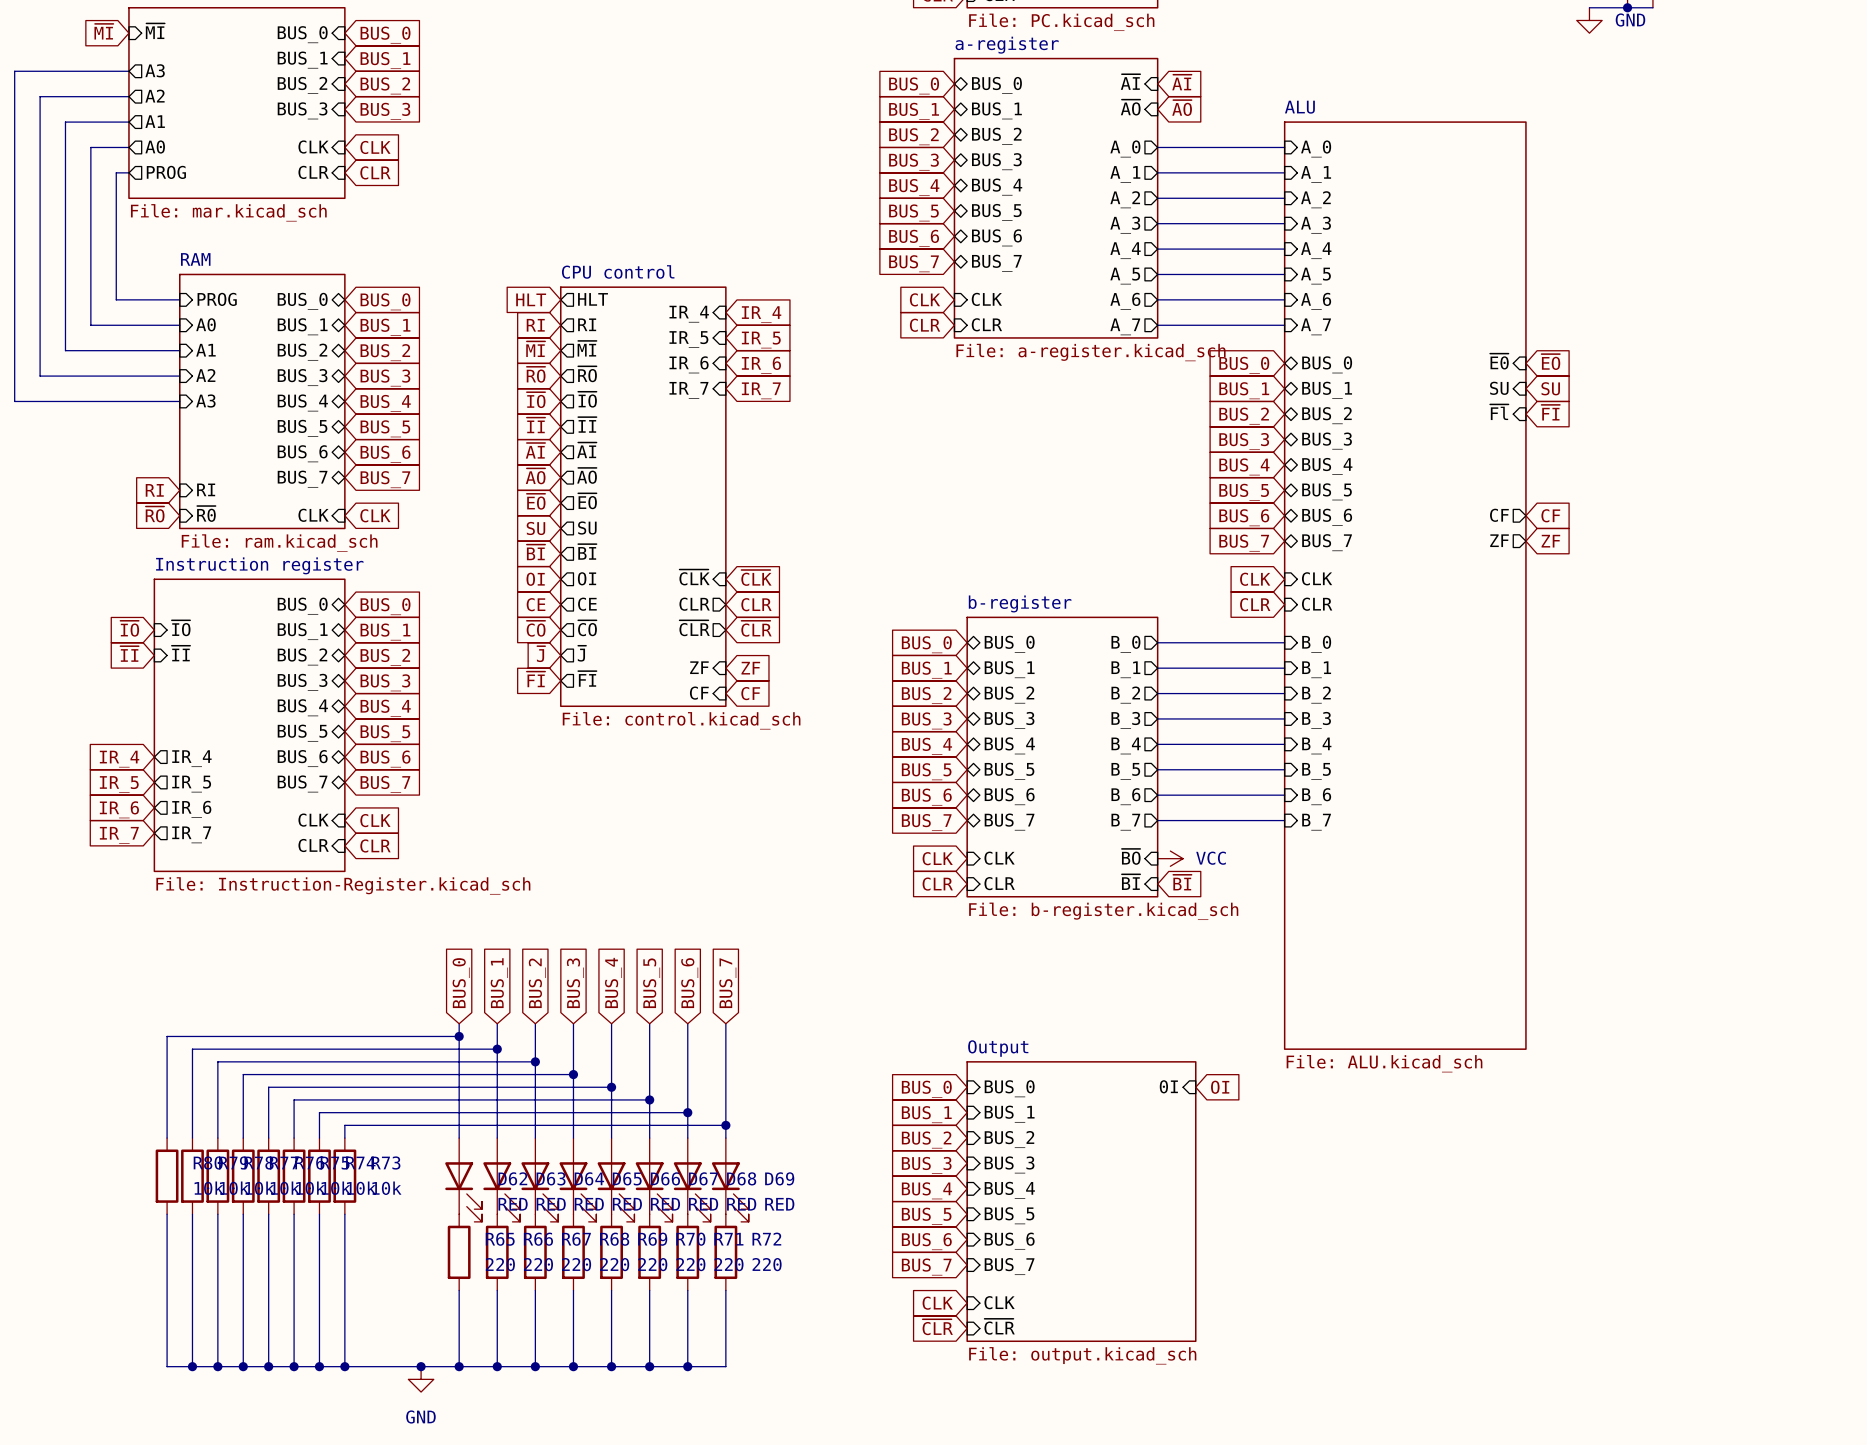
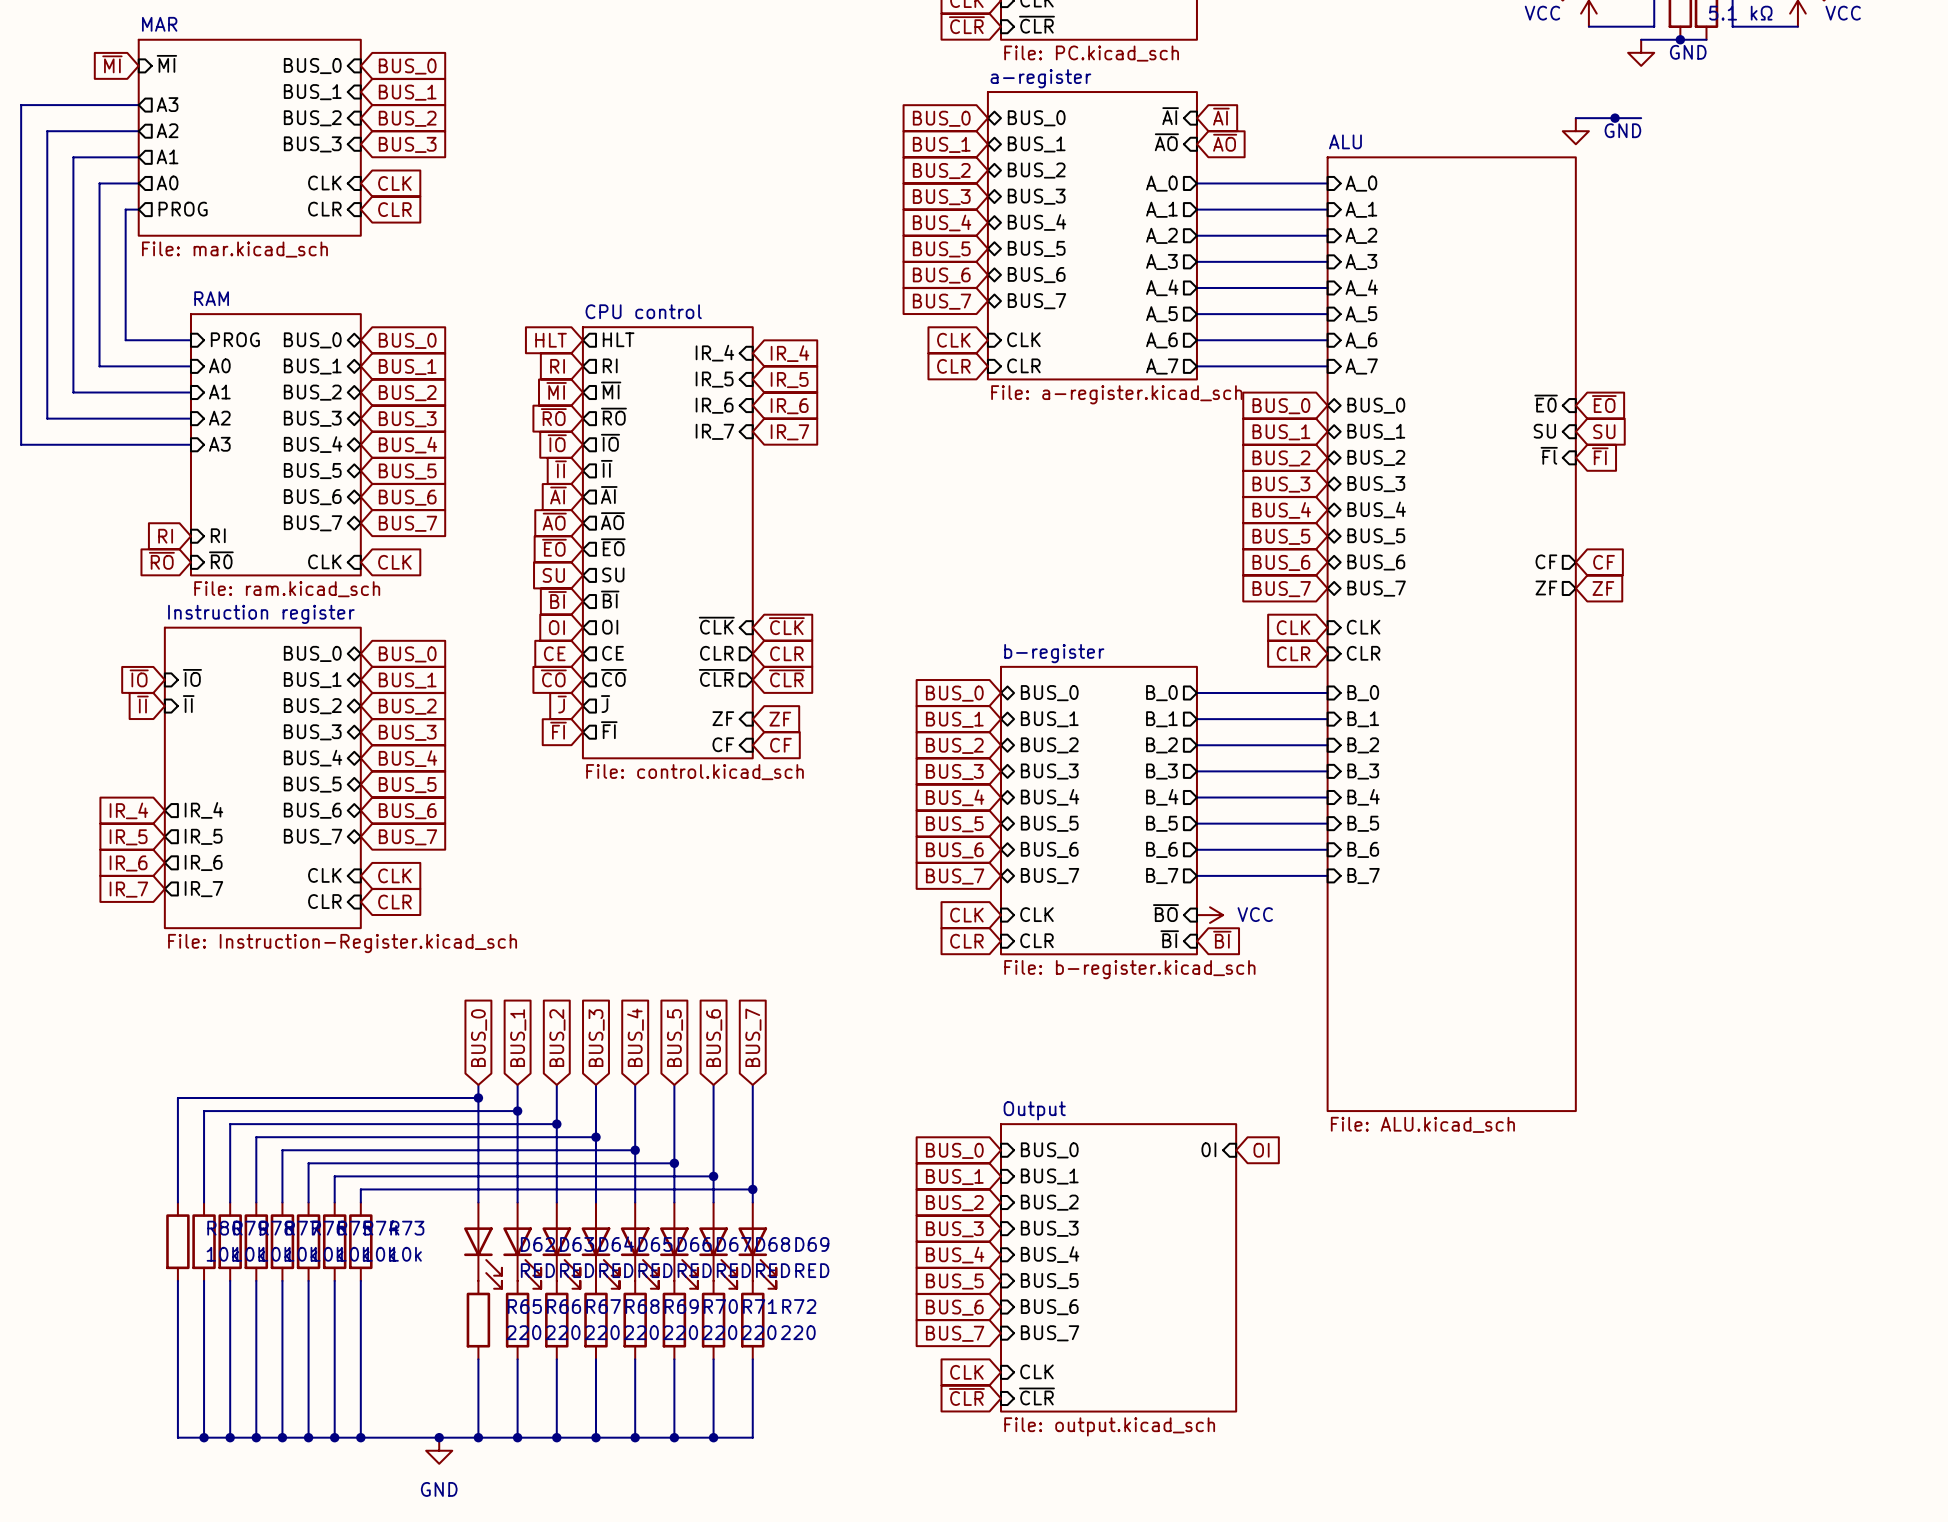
wire: none -> (1575, 118) (1641, 118)
junction: none -> (1615, 118)
power symbol: none -> GND (1575, 131)

